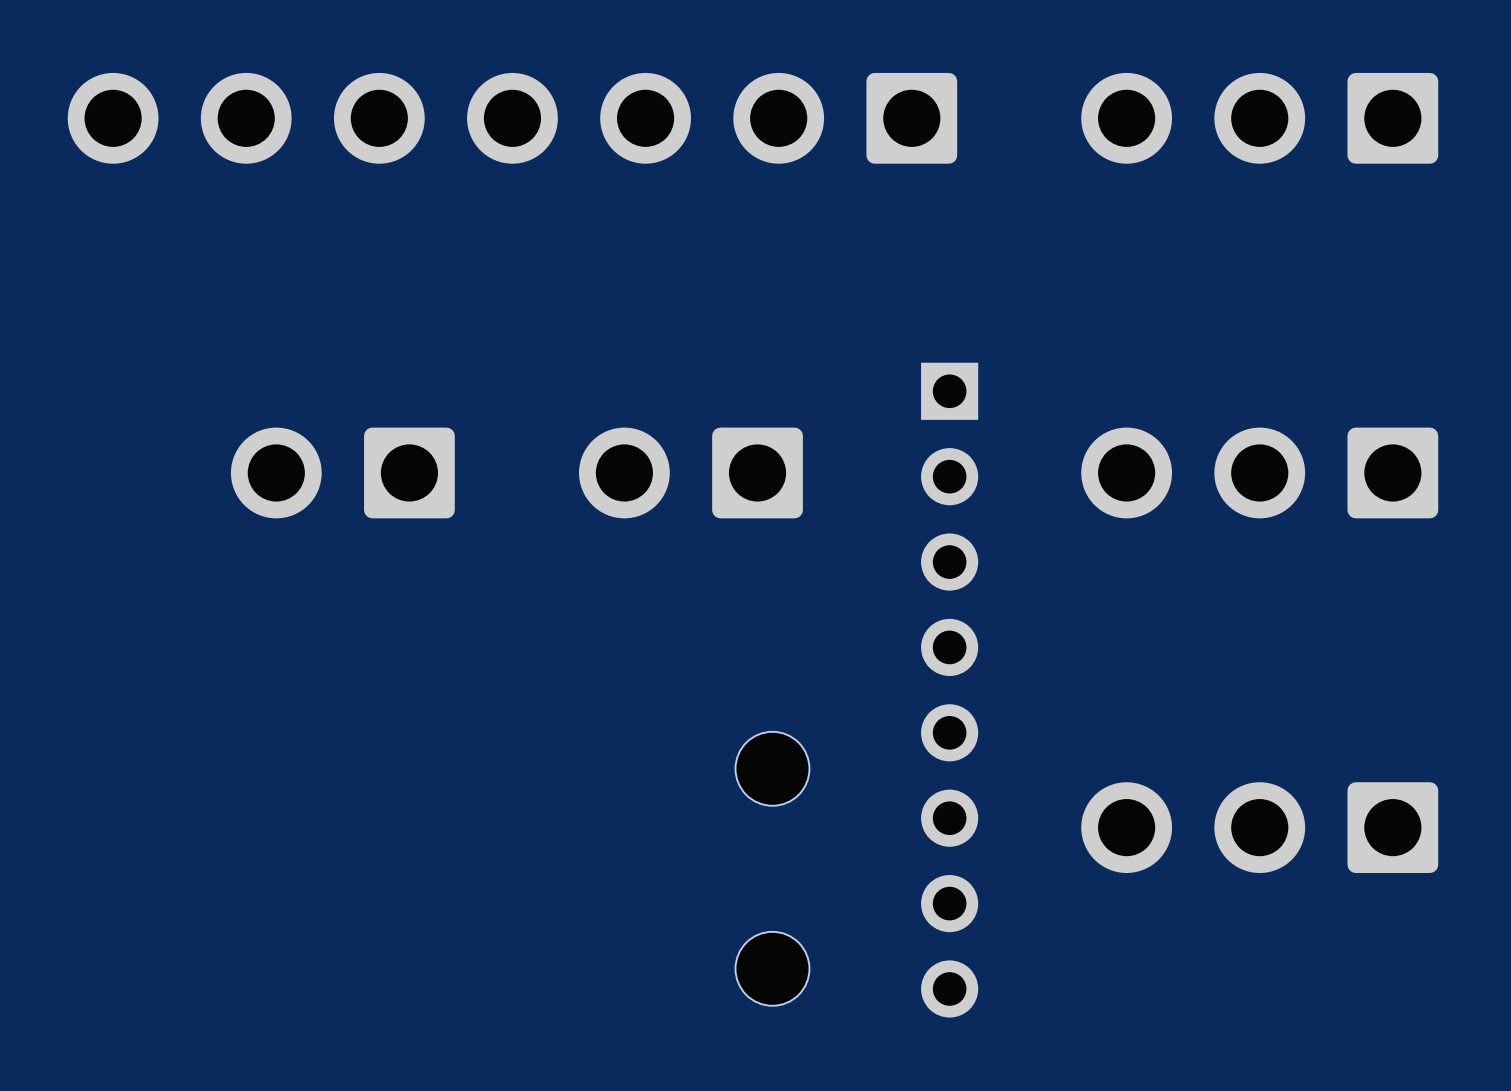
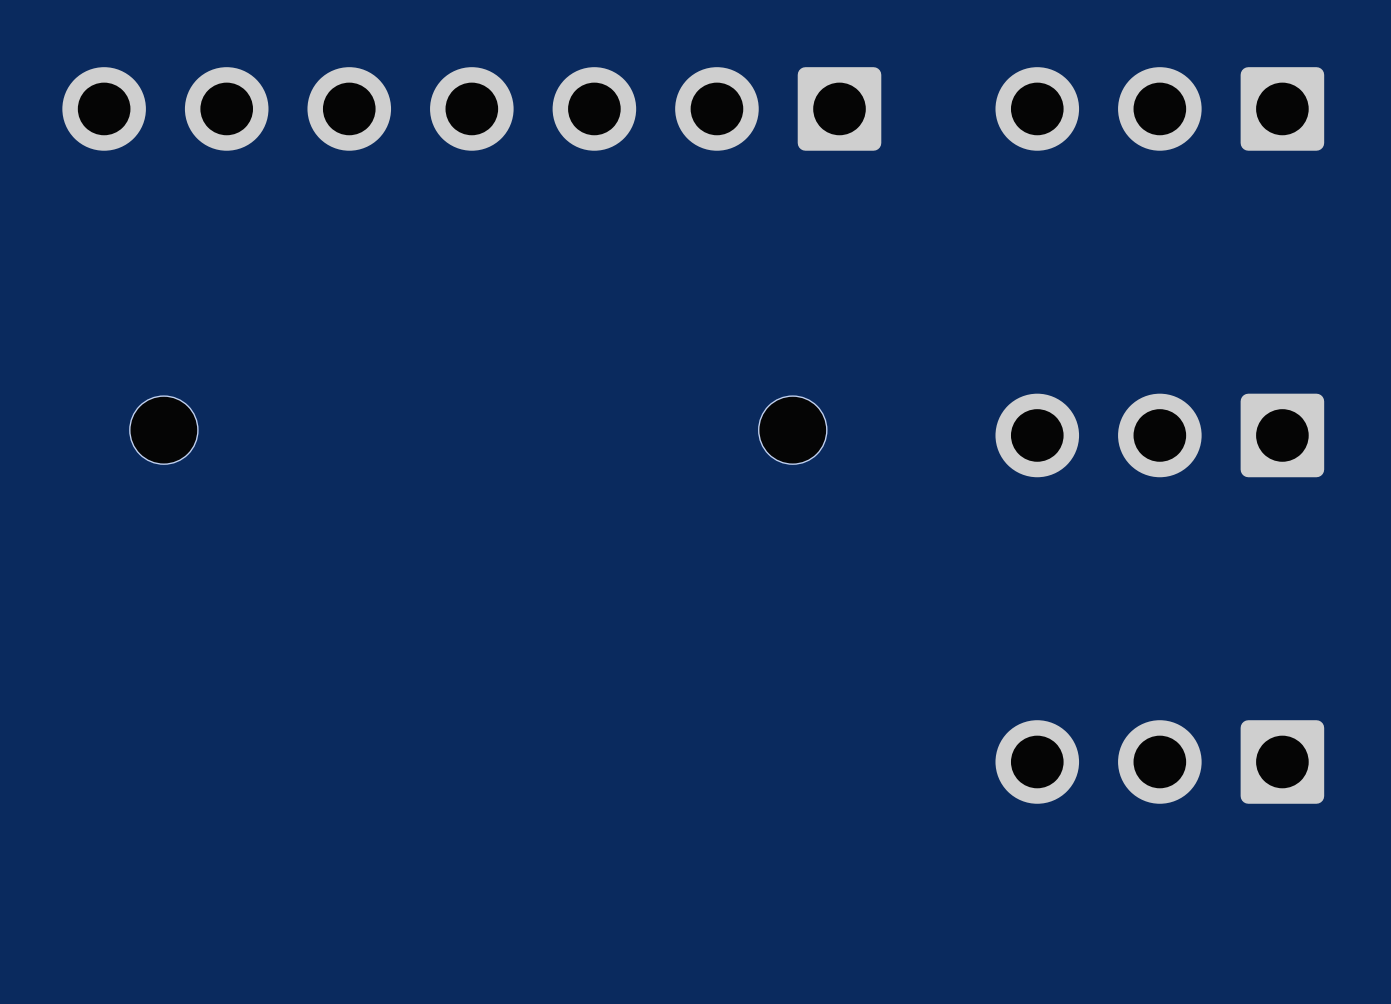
part: none -> (163, 430)
part: none -> (792, 430)
part: (342, 472) -> none
part: (690, 472) -> none
part: (949, 690) -> none
part: (772, 768) -> none
part: (772, 968) -> none

